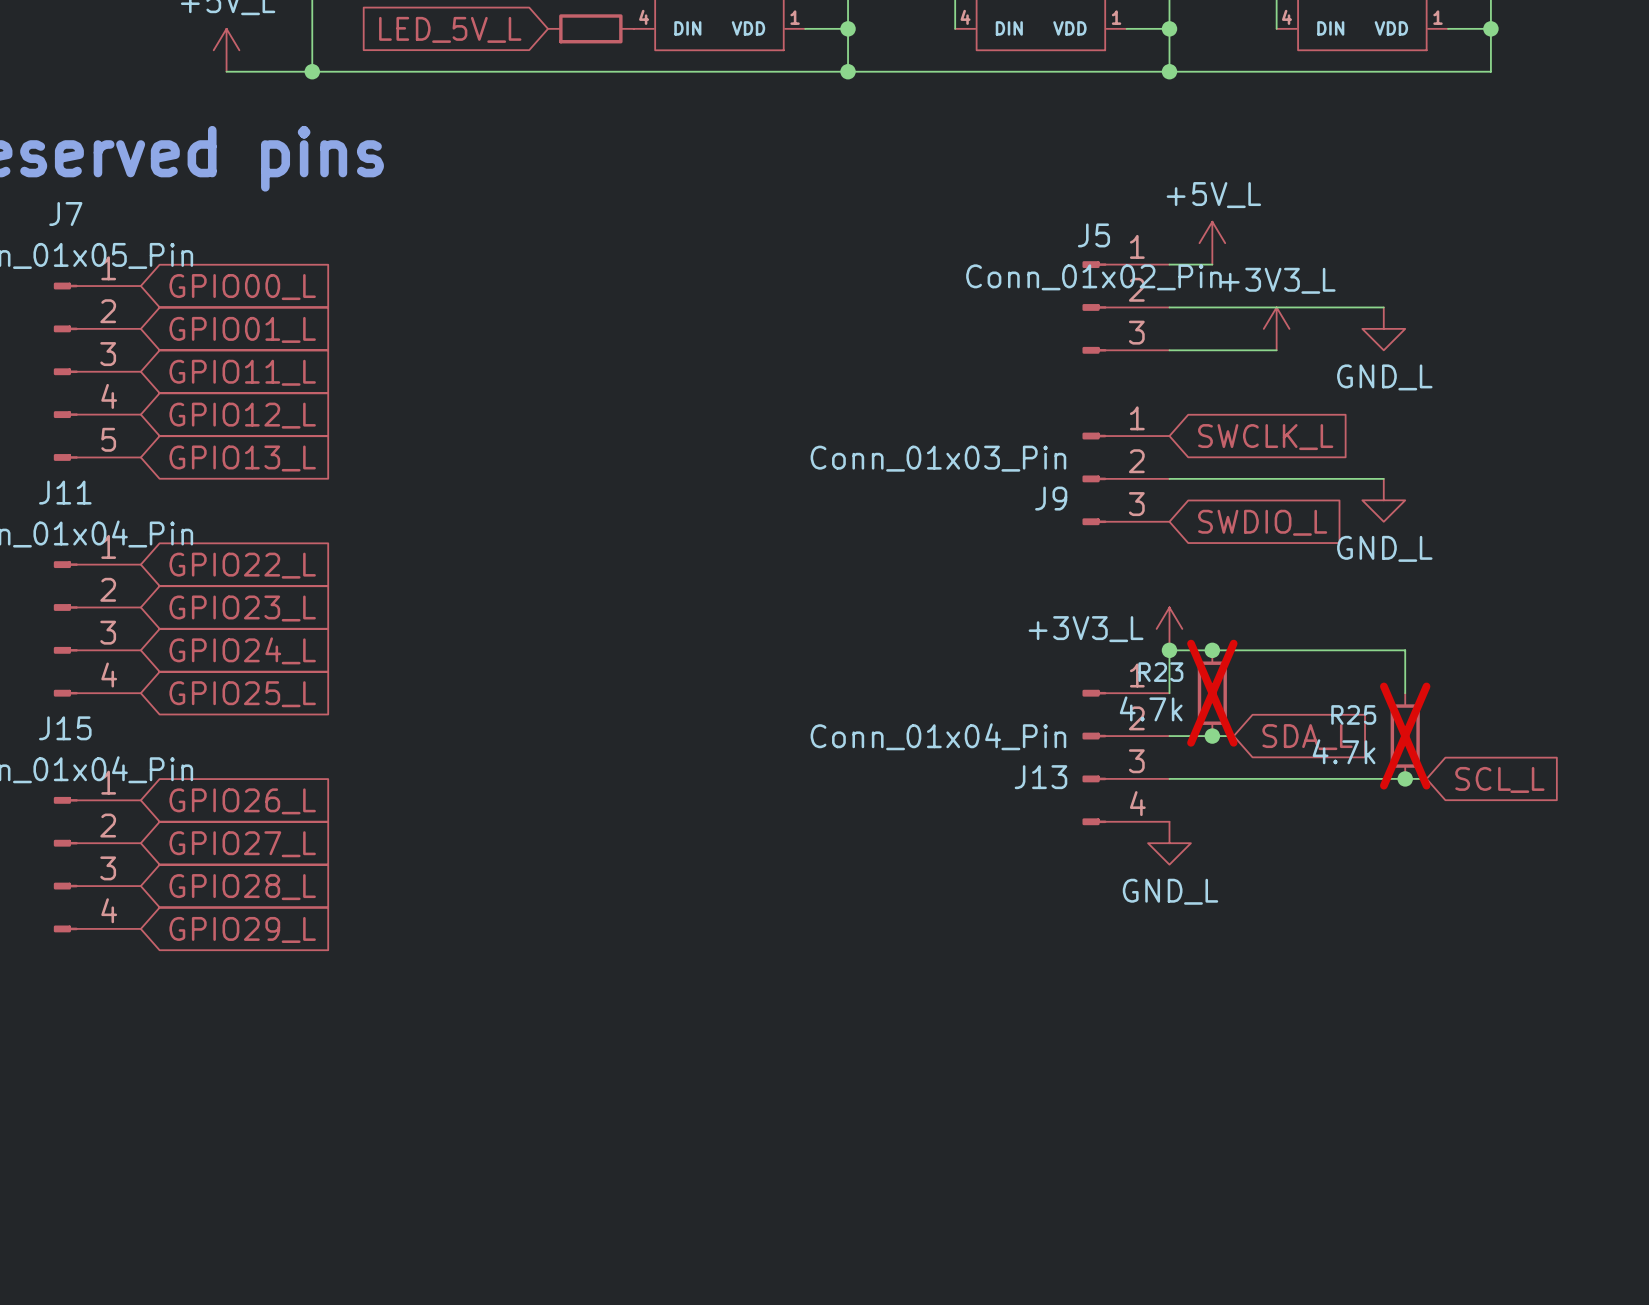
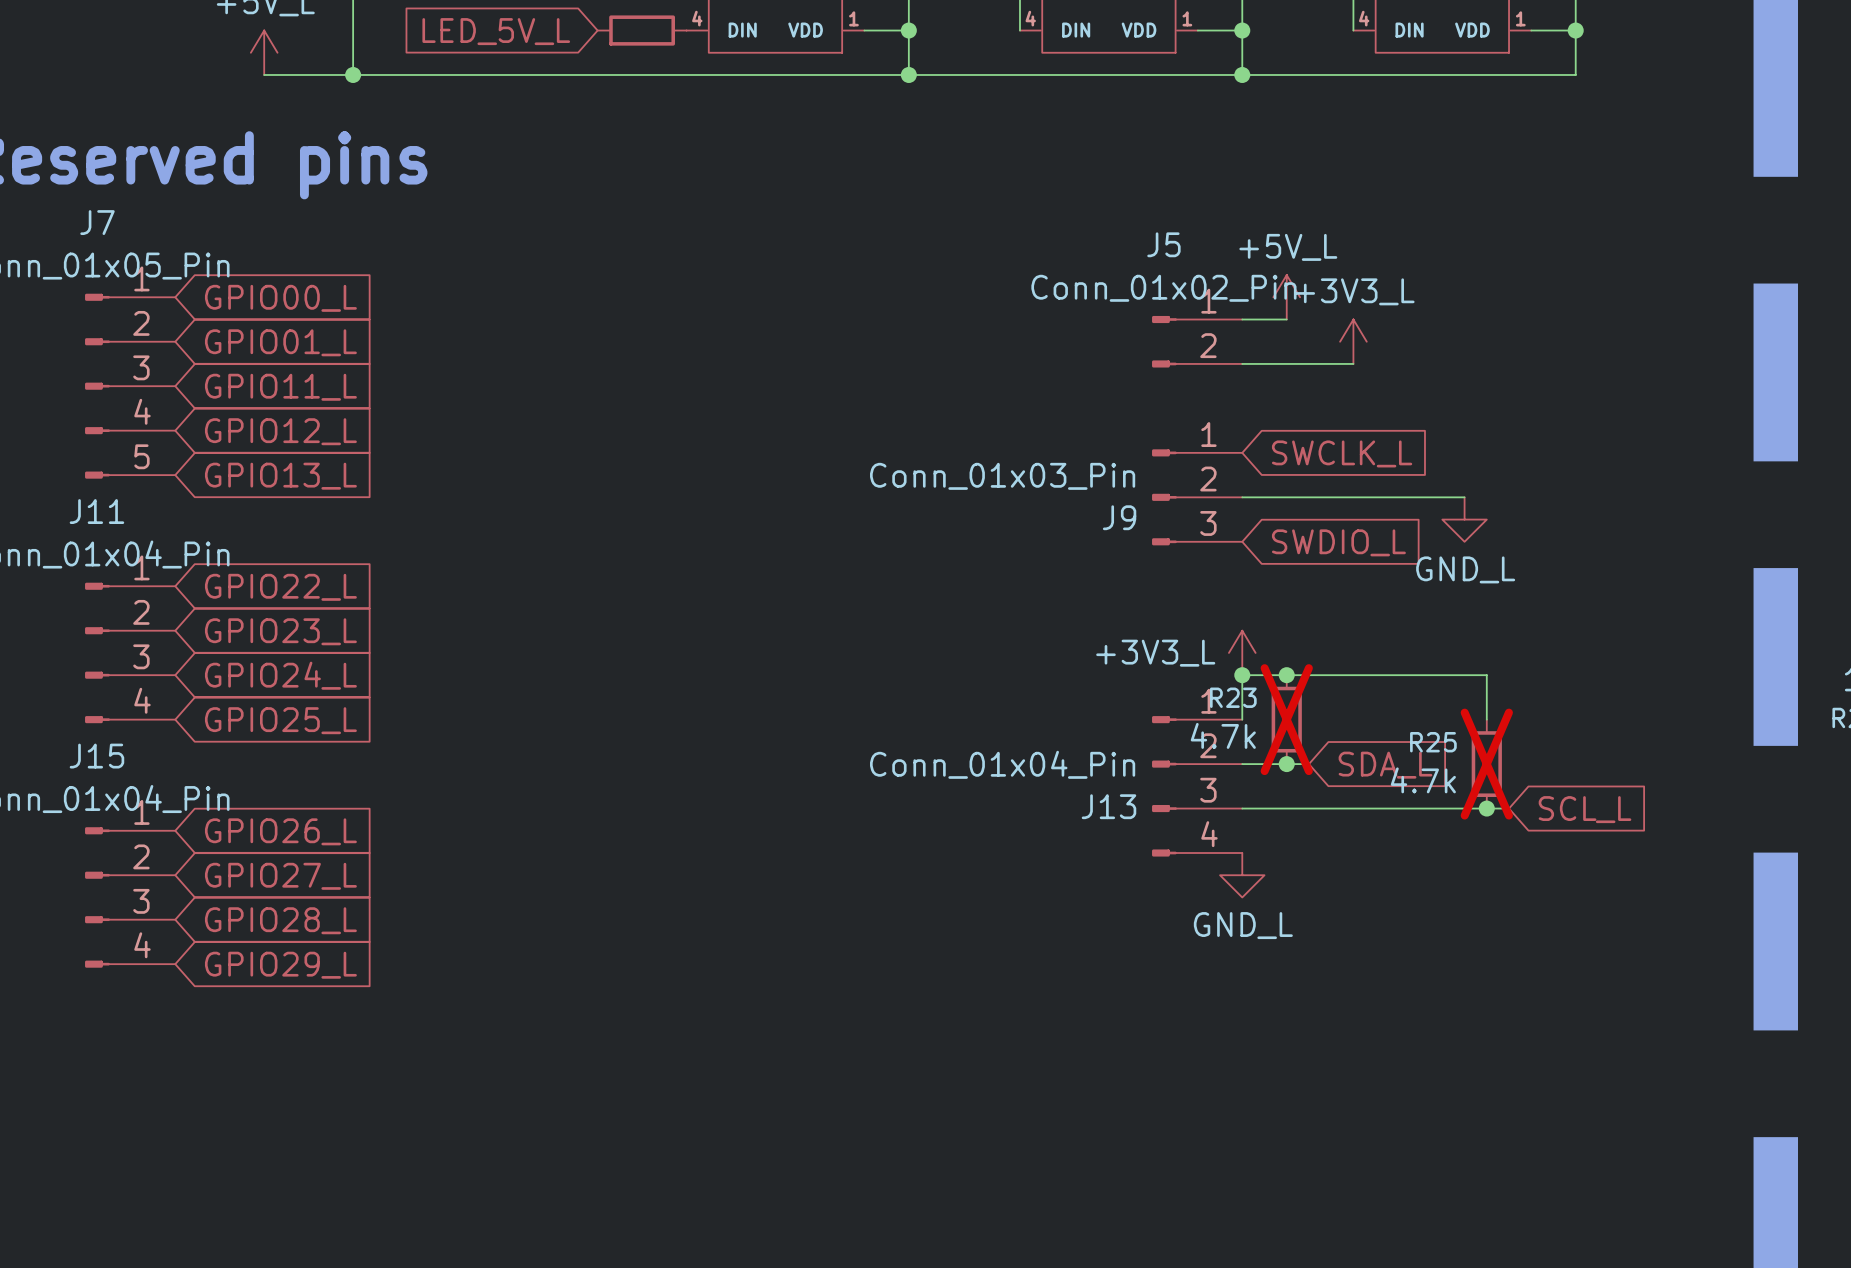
power symbol position: +5V_L (1212, 243) -> +5V_L (1286, 297)
J5 symbol: [1082, 261, 1170, 354] -> [1152, 315, 1243, 368]
wire: (1169, 264) (1212, 264) -> none
wire: (1212, 307) (1383, 307) -> none
power symbol: GND_L (1383, 328) -> none

